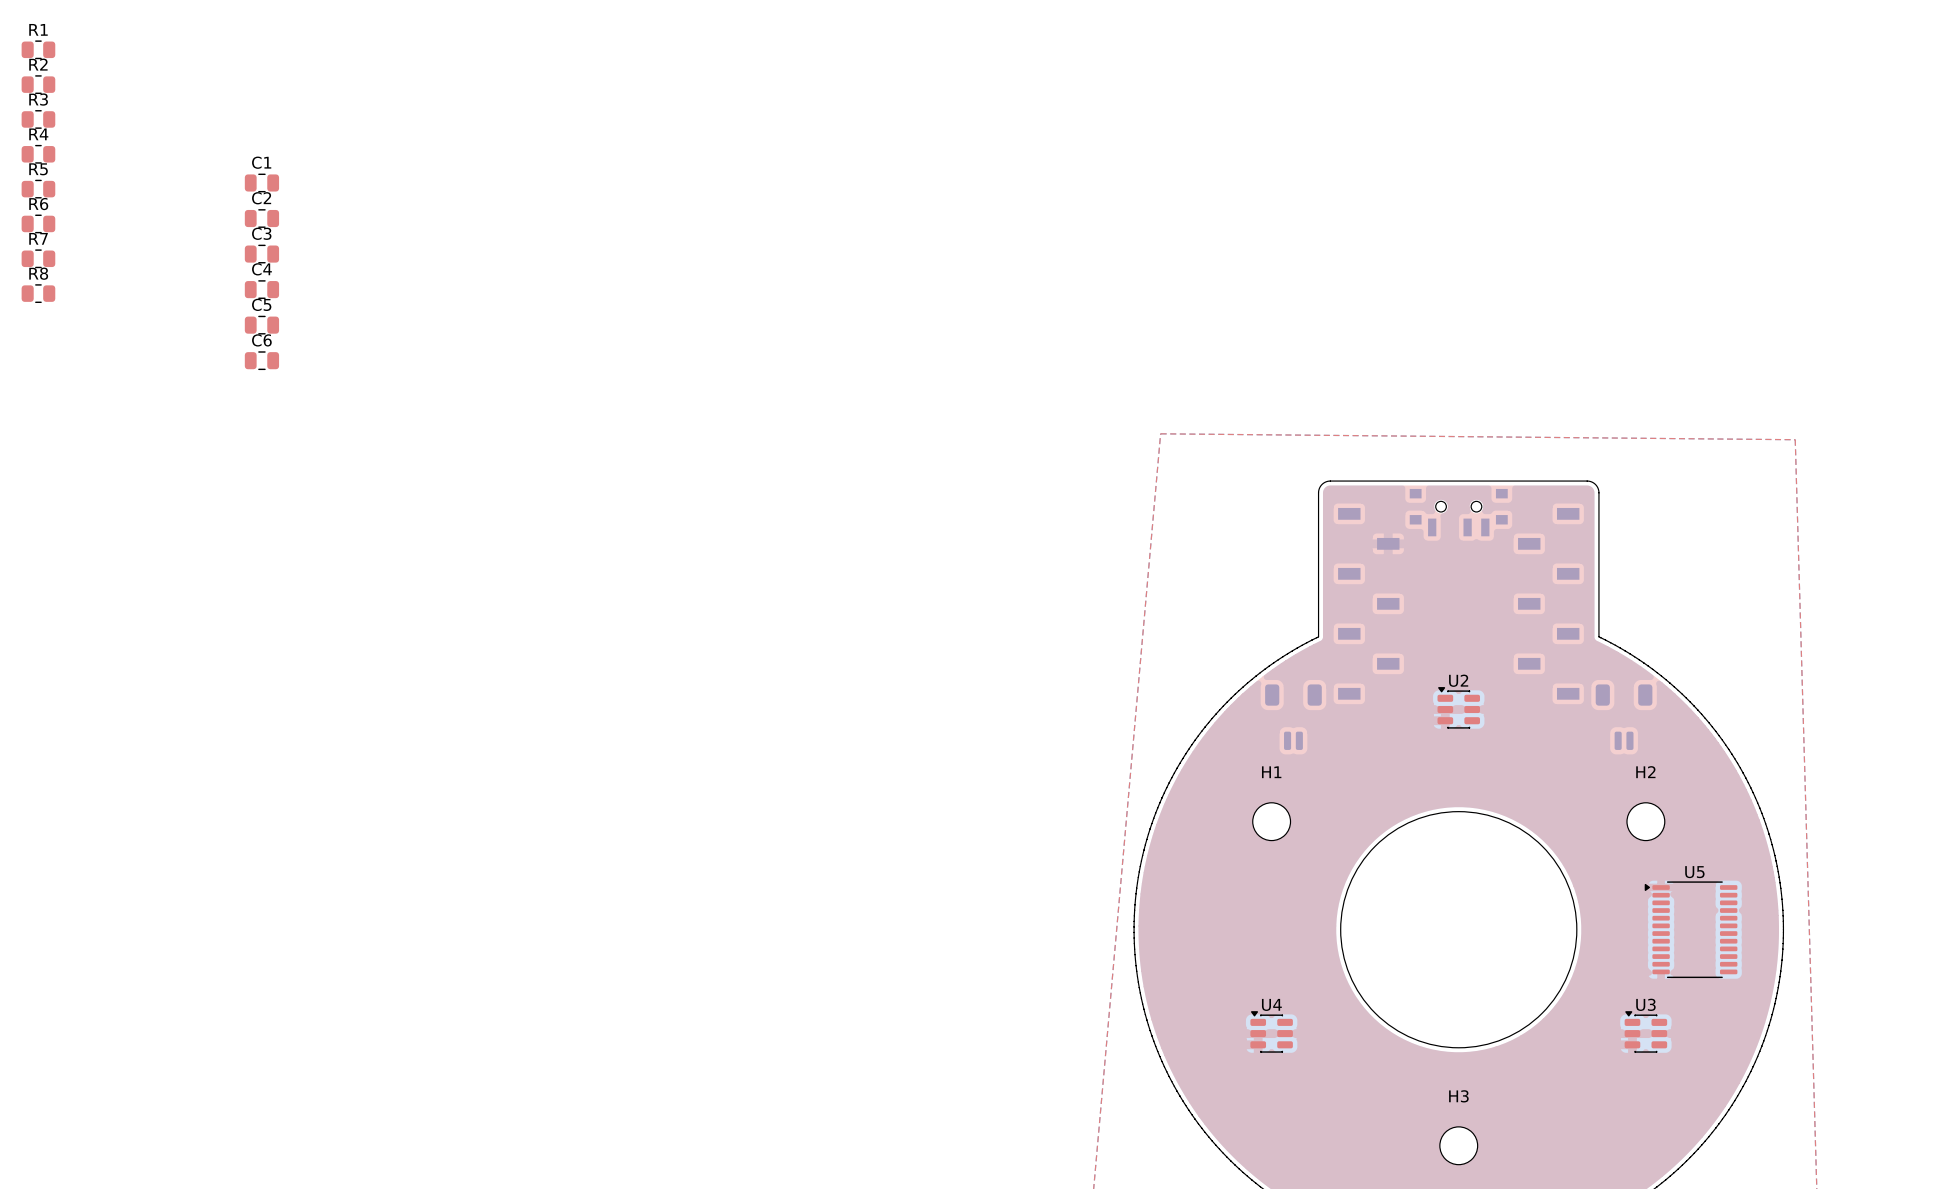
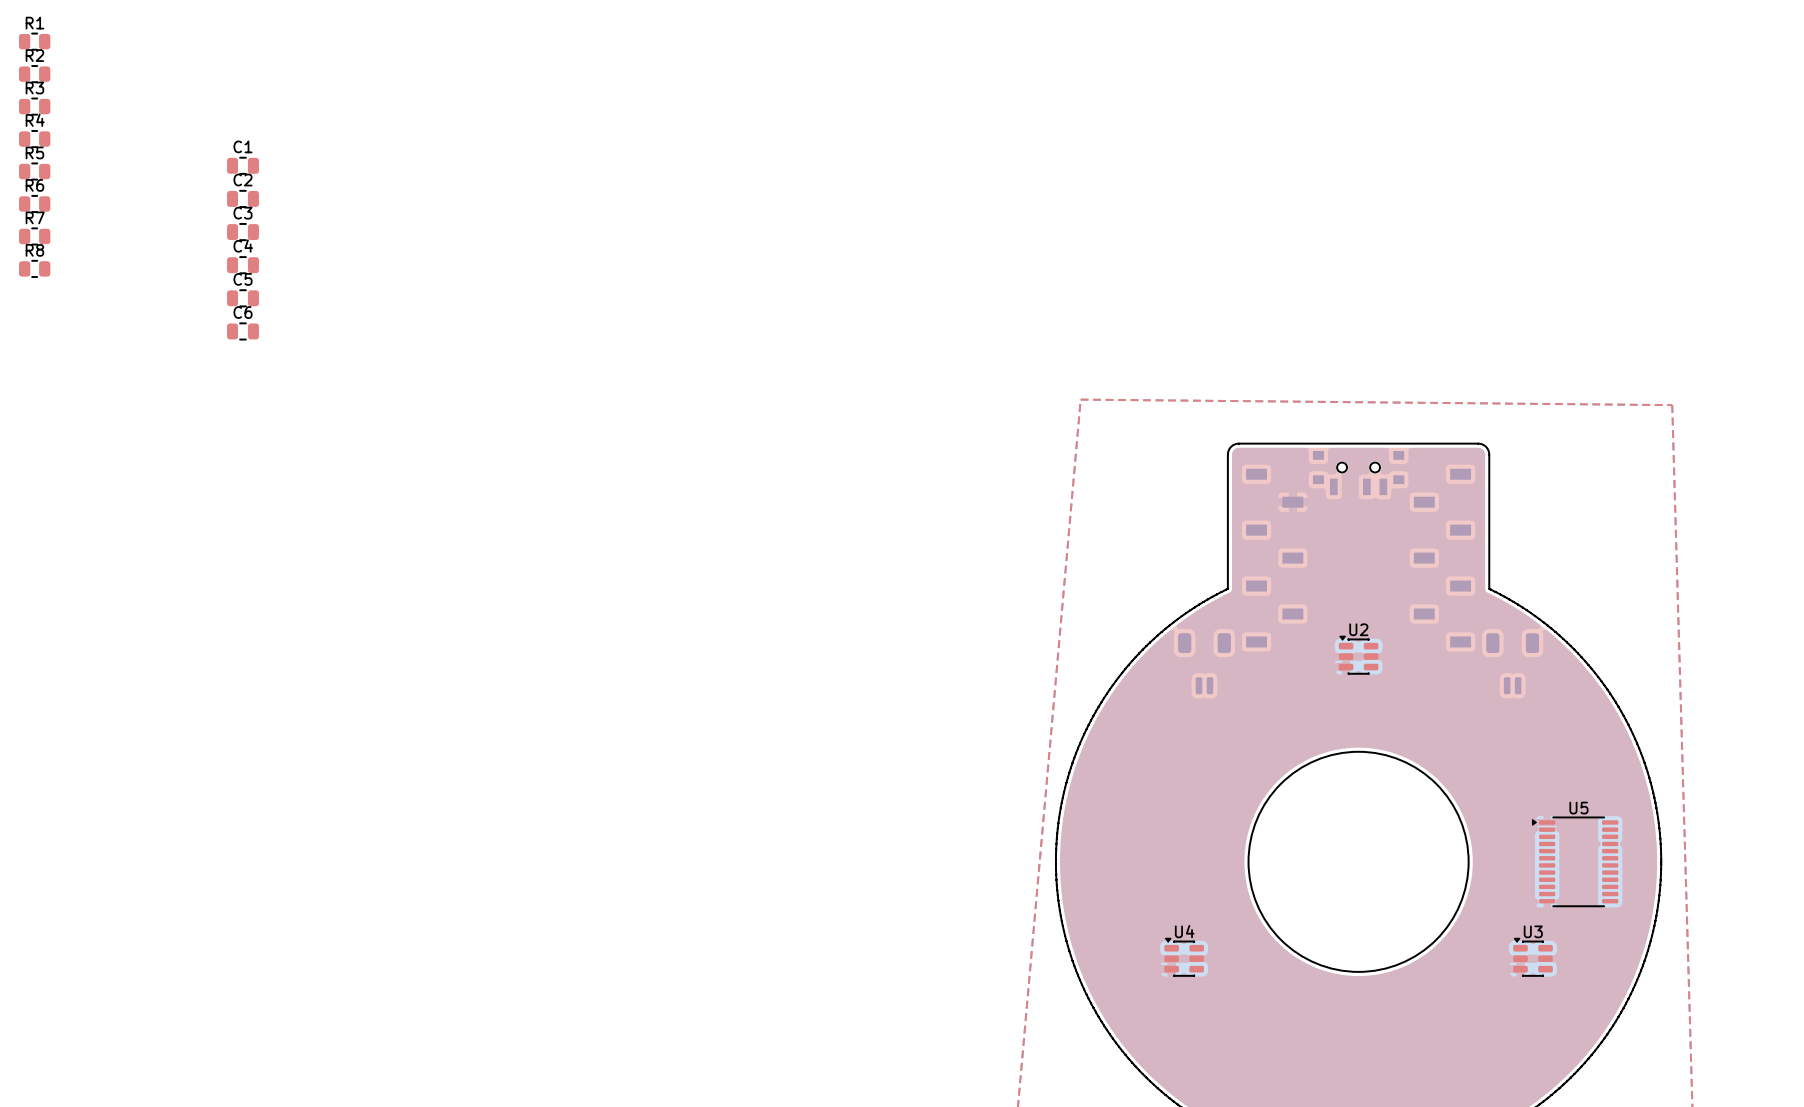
H1: (1271, 821) -> none
H2: (1645, 821) -> none
H3: (1458, 1145) -> none

